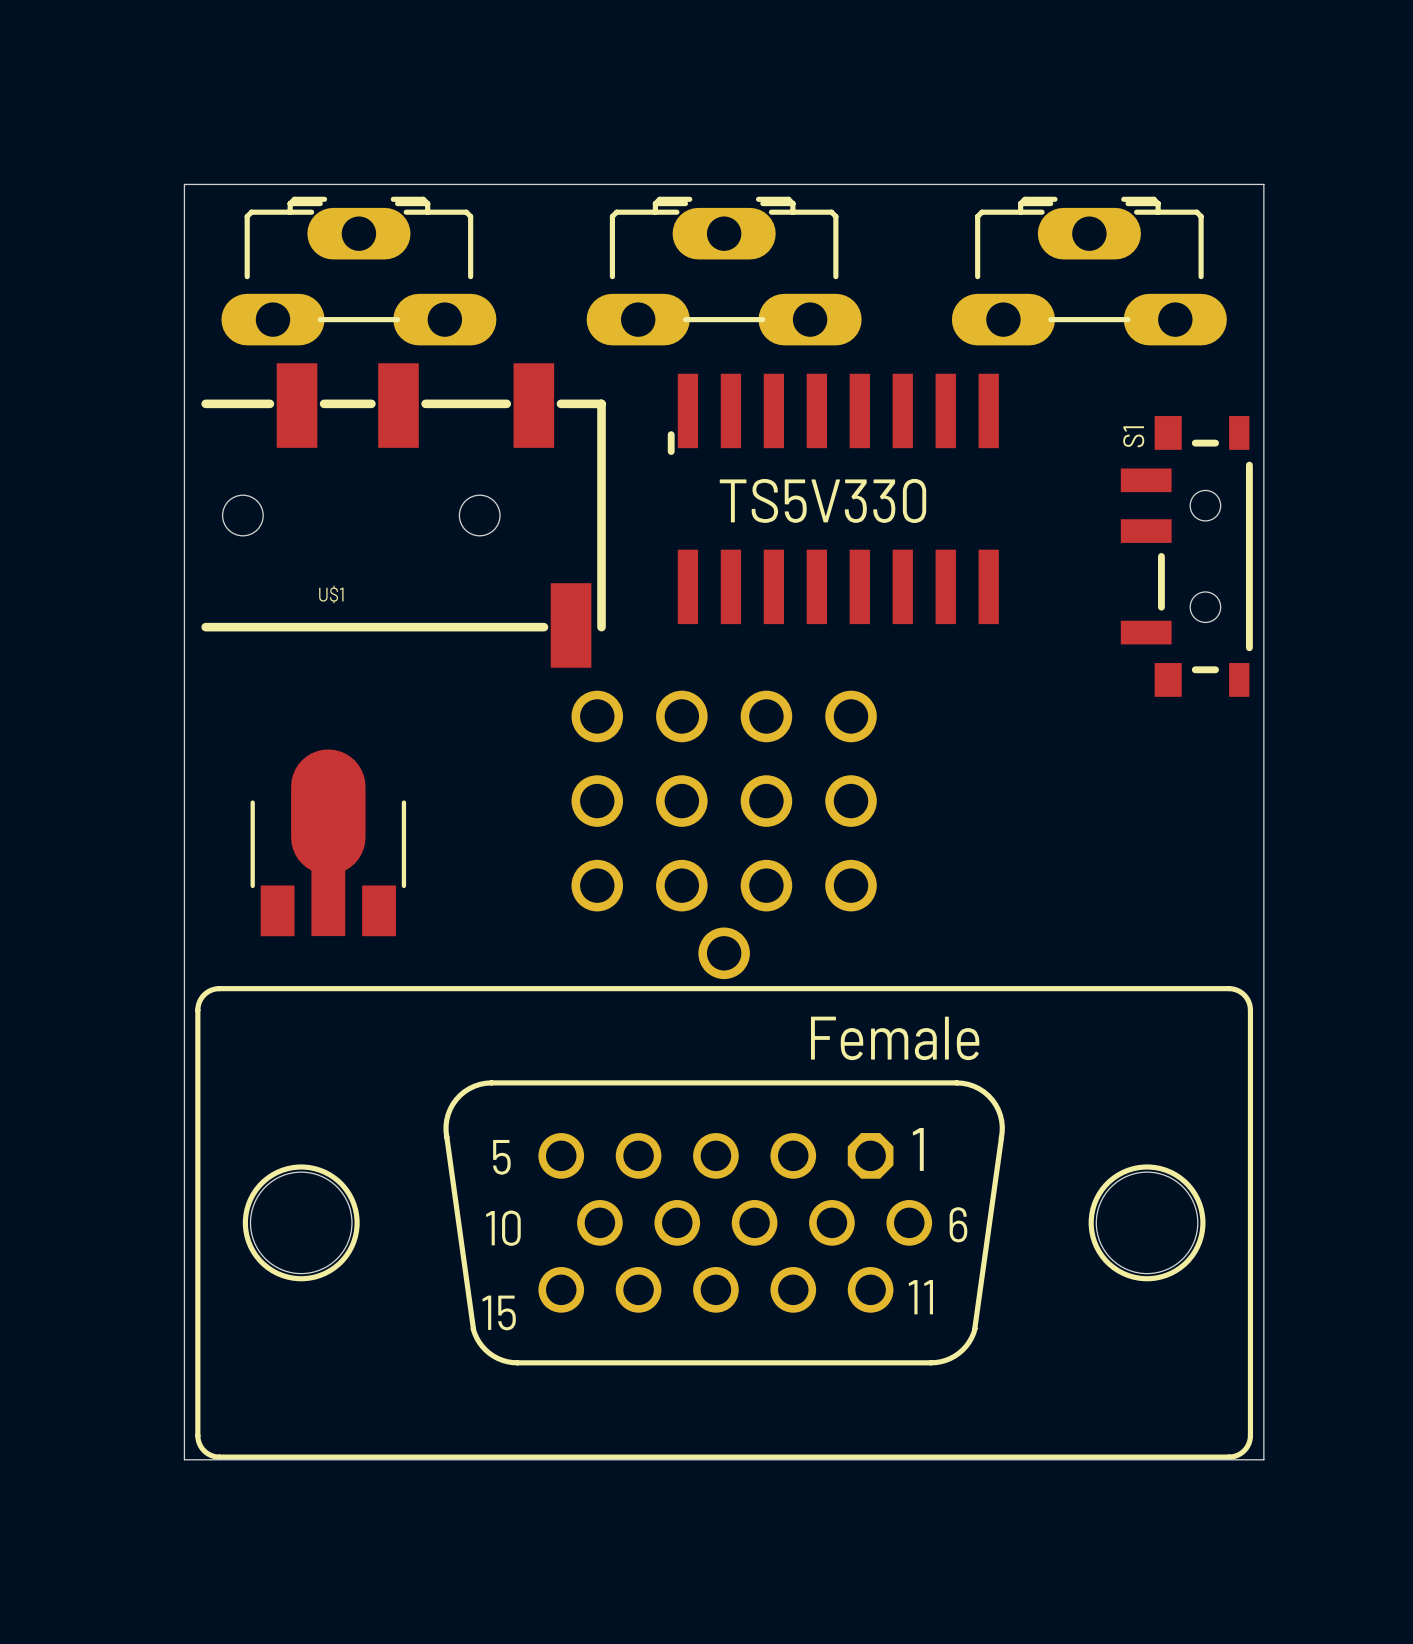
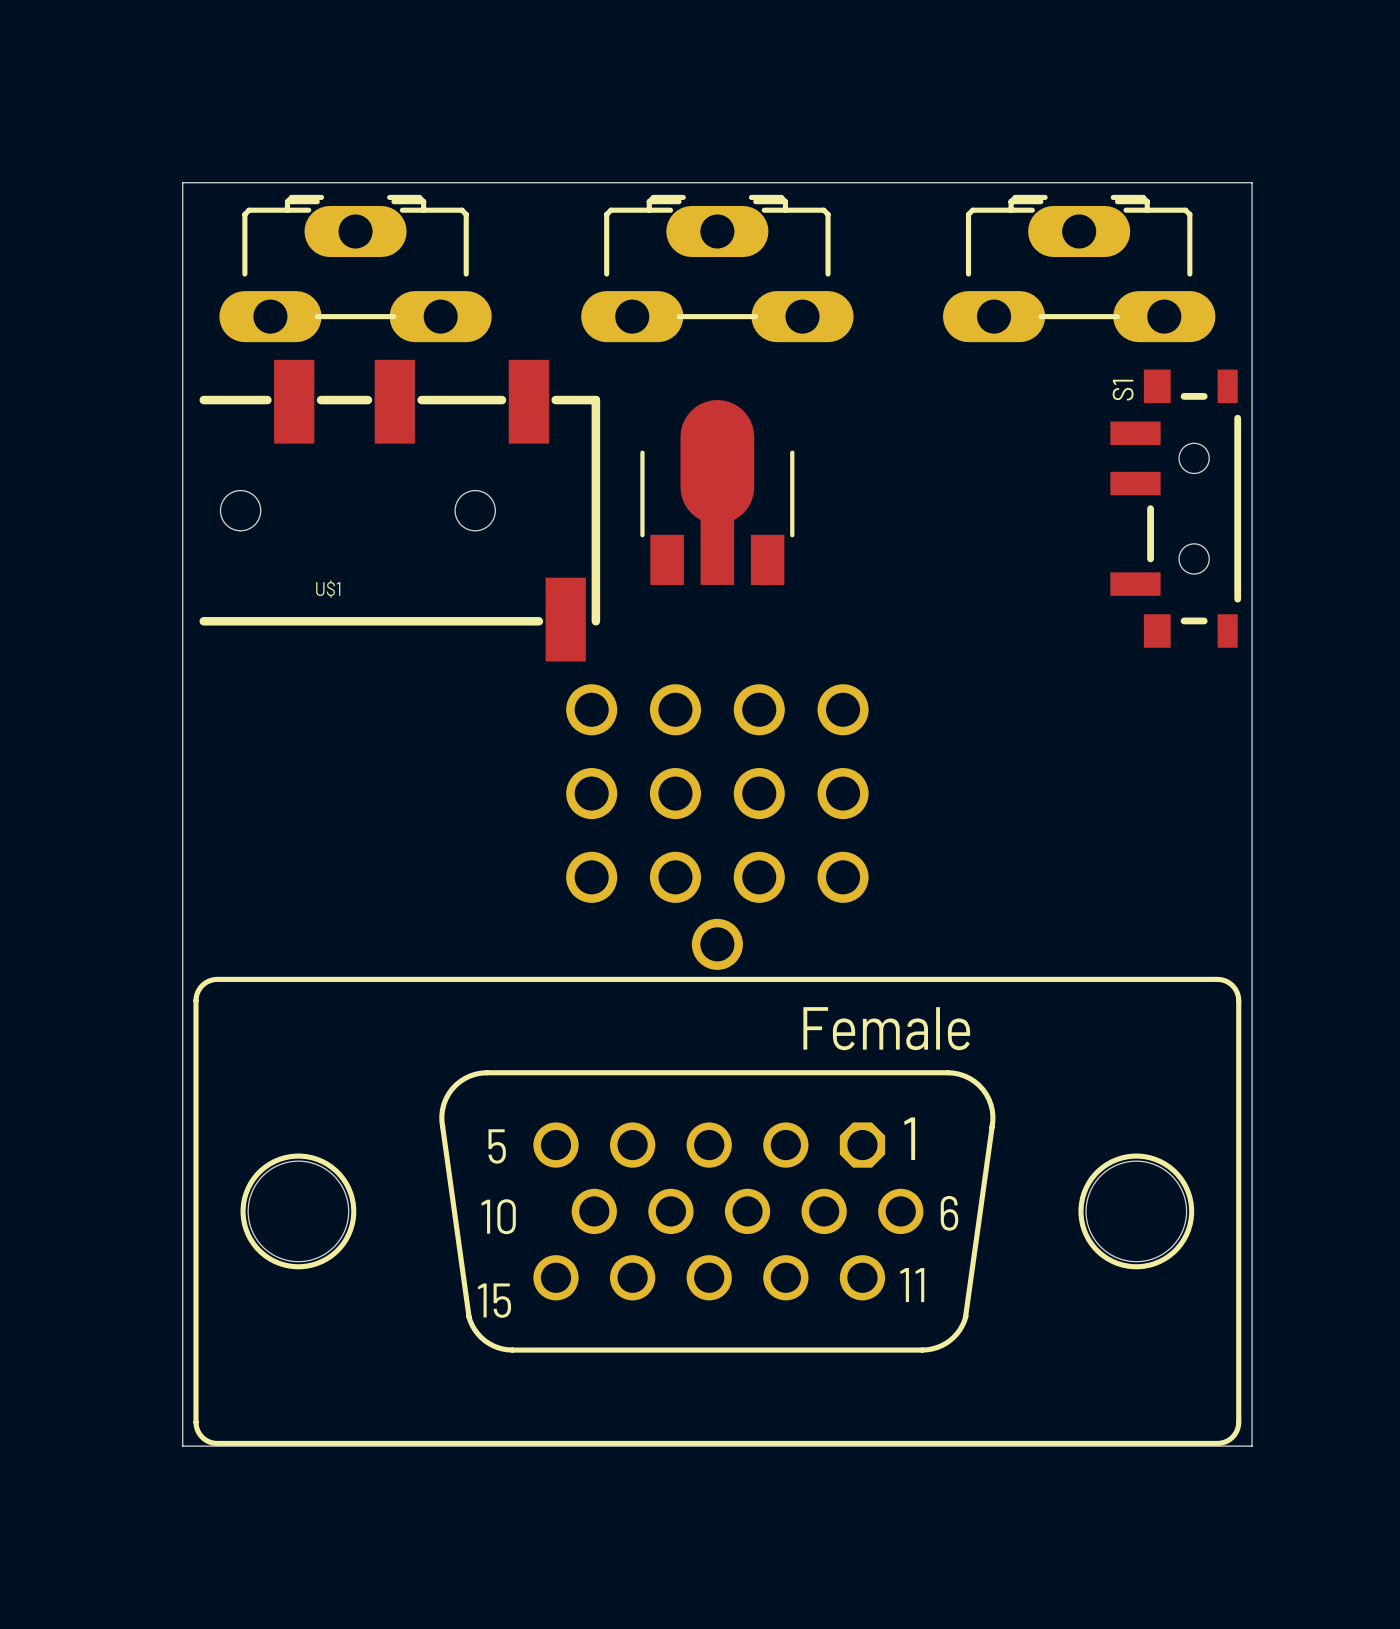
TS5V330: (833, 498) -> none
S1 position: (1186, 556) -> (1175, 508)
part position: (328, 842) -> (717, 492)

